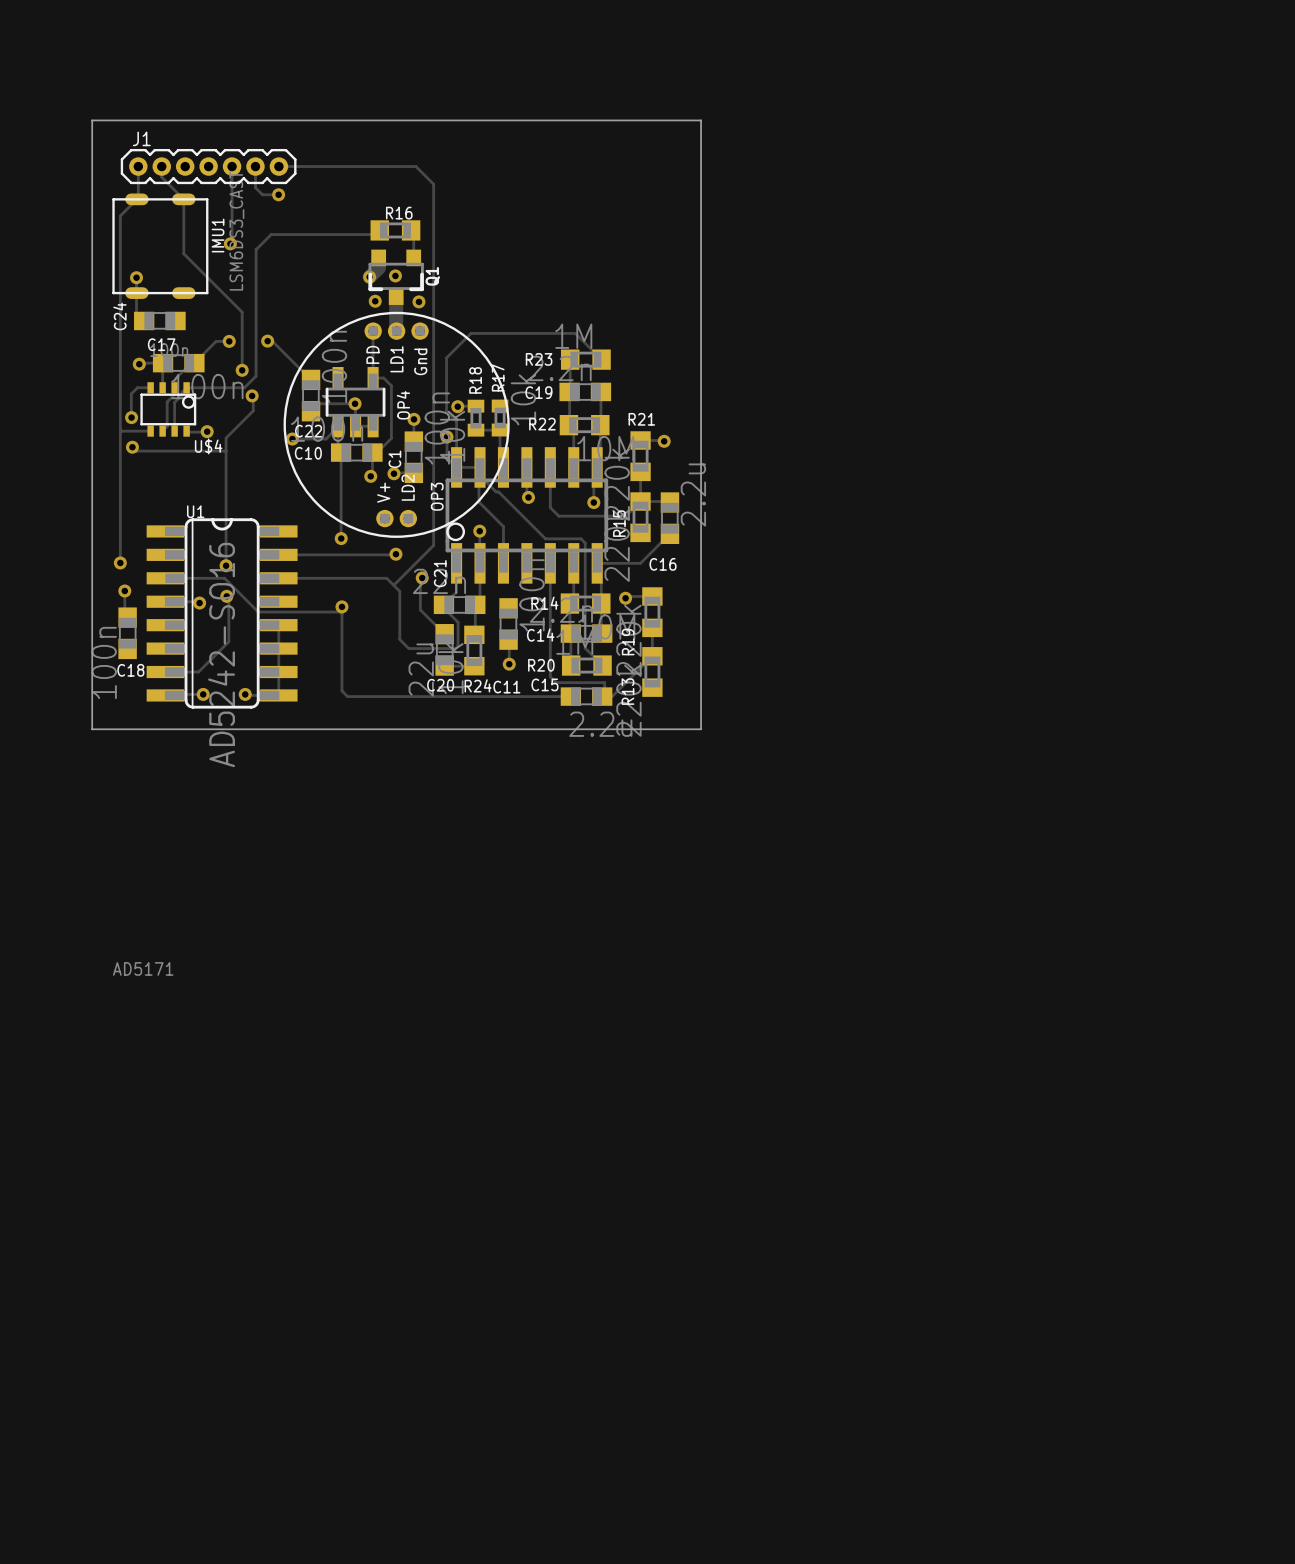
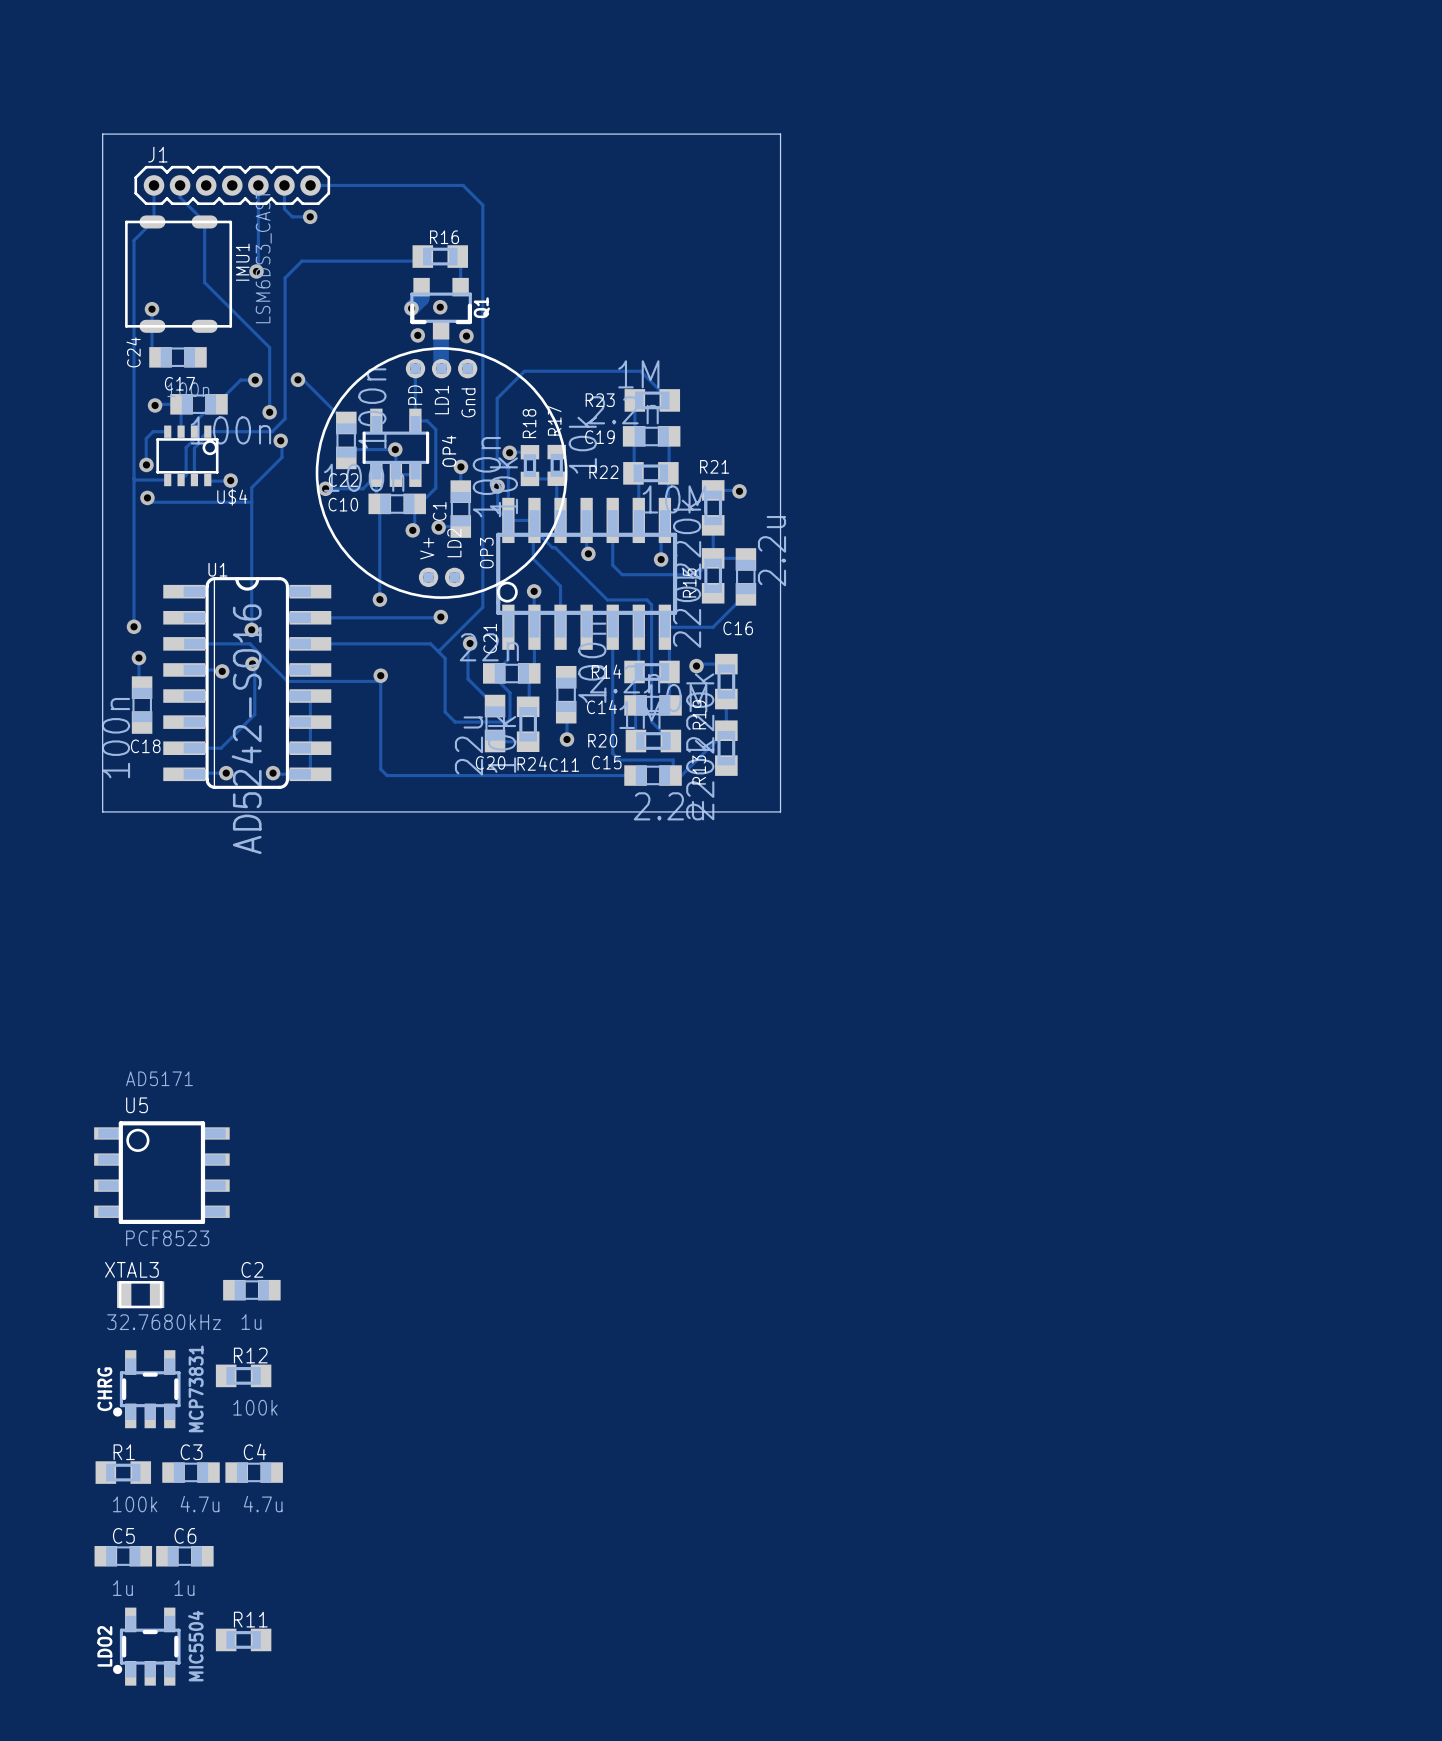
U5: none -> PCF8523 (161, 1172)
C2: none -> 1u (251, 1290)
XTAL3: none -> 32.7680kHz (140, 1294)
R12: none -> 100k (243, 1375)
CHRG: none -> MCP73831 (146, 1389)
R1: none -> 100k (123, 1472)
C3: none -> 4.7u (191, 1472)
C4: none -> 4.7u (254, 1472)
C5: none -> 1u (123, 1556)
C6: none -> 1u (184, 1556)
R11: none -> (243, 1639)
LDO2: none -> MIC5504 (146, 1646)

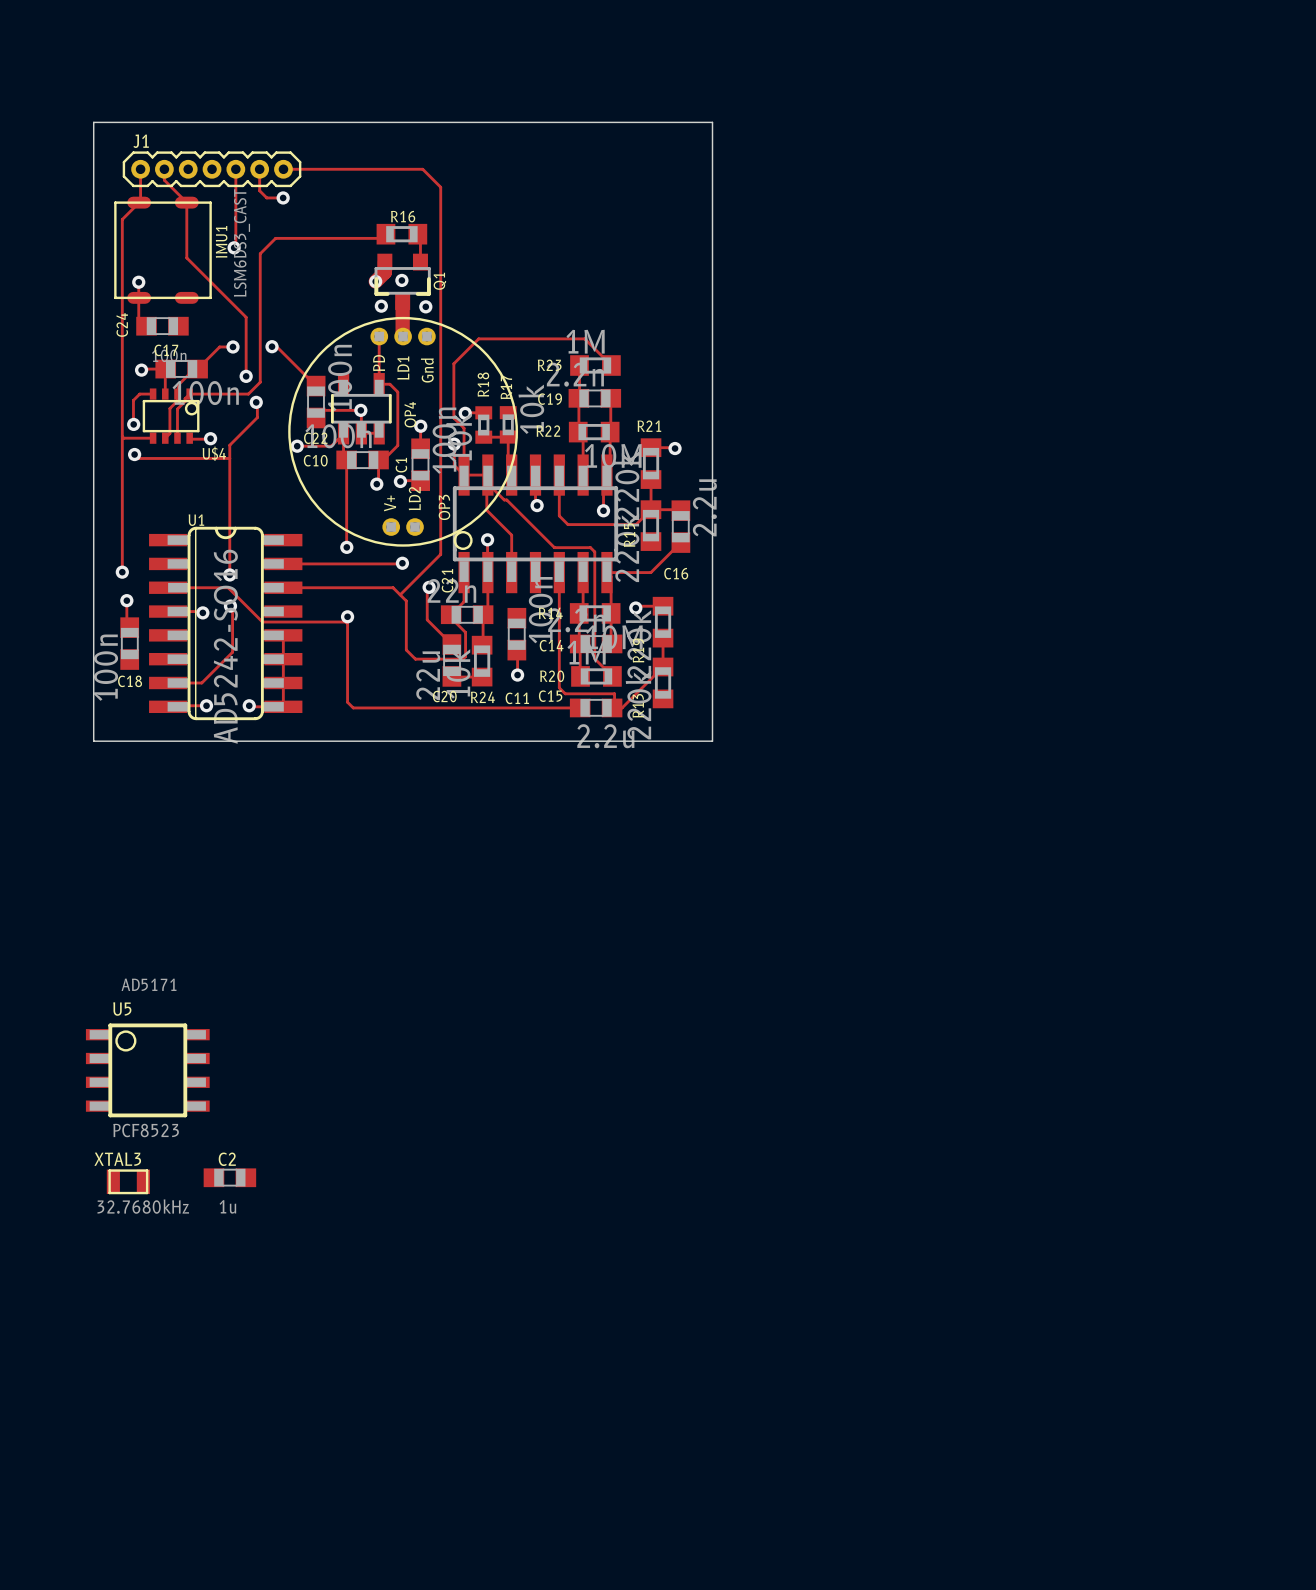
R12: 100k (243, 1375) -> none
CHRG: MCP73831 (146, 1389) -> none
R1: 100k (123, 1472) -> none
C3: 4.7u (191, 1472) -> none
C4: 4.7u (254, 1472) -> none
C5: 1u (123, 1556) -> none
C6: 1u (184, 1556) -> none
R11: (243, 1639) -> none
LDO2: MIC5504 (146, 1646) -> none

